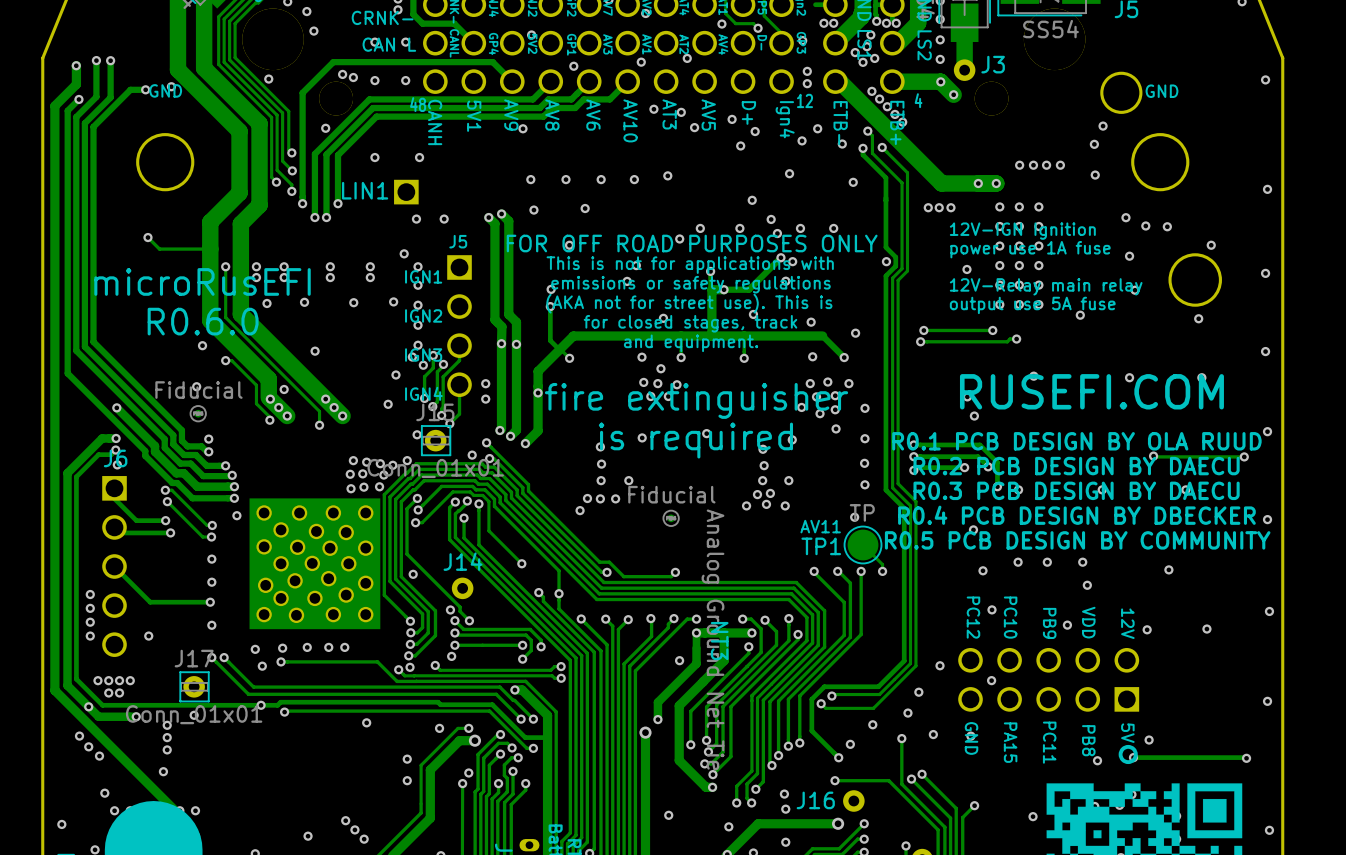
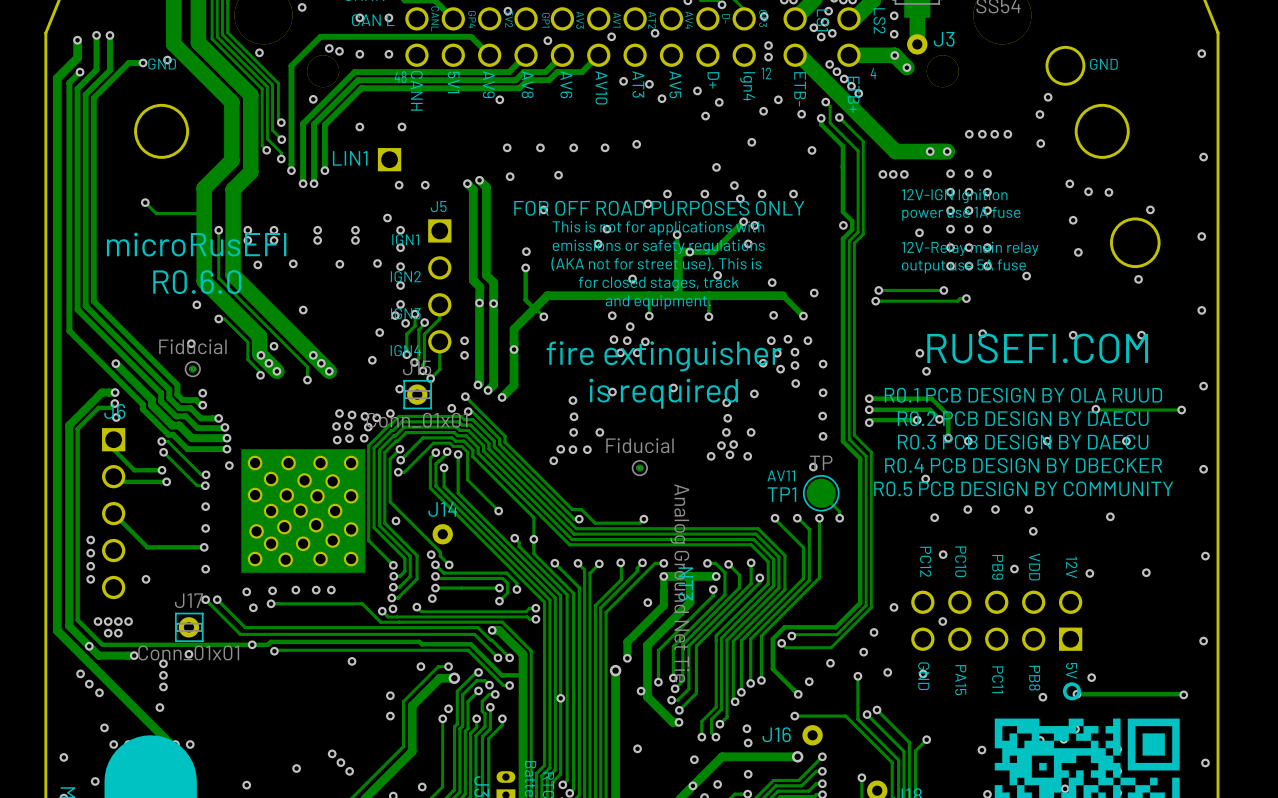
via: none -> (641, 691)
via: none -> (560, 698)

